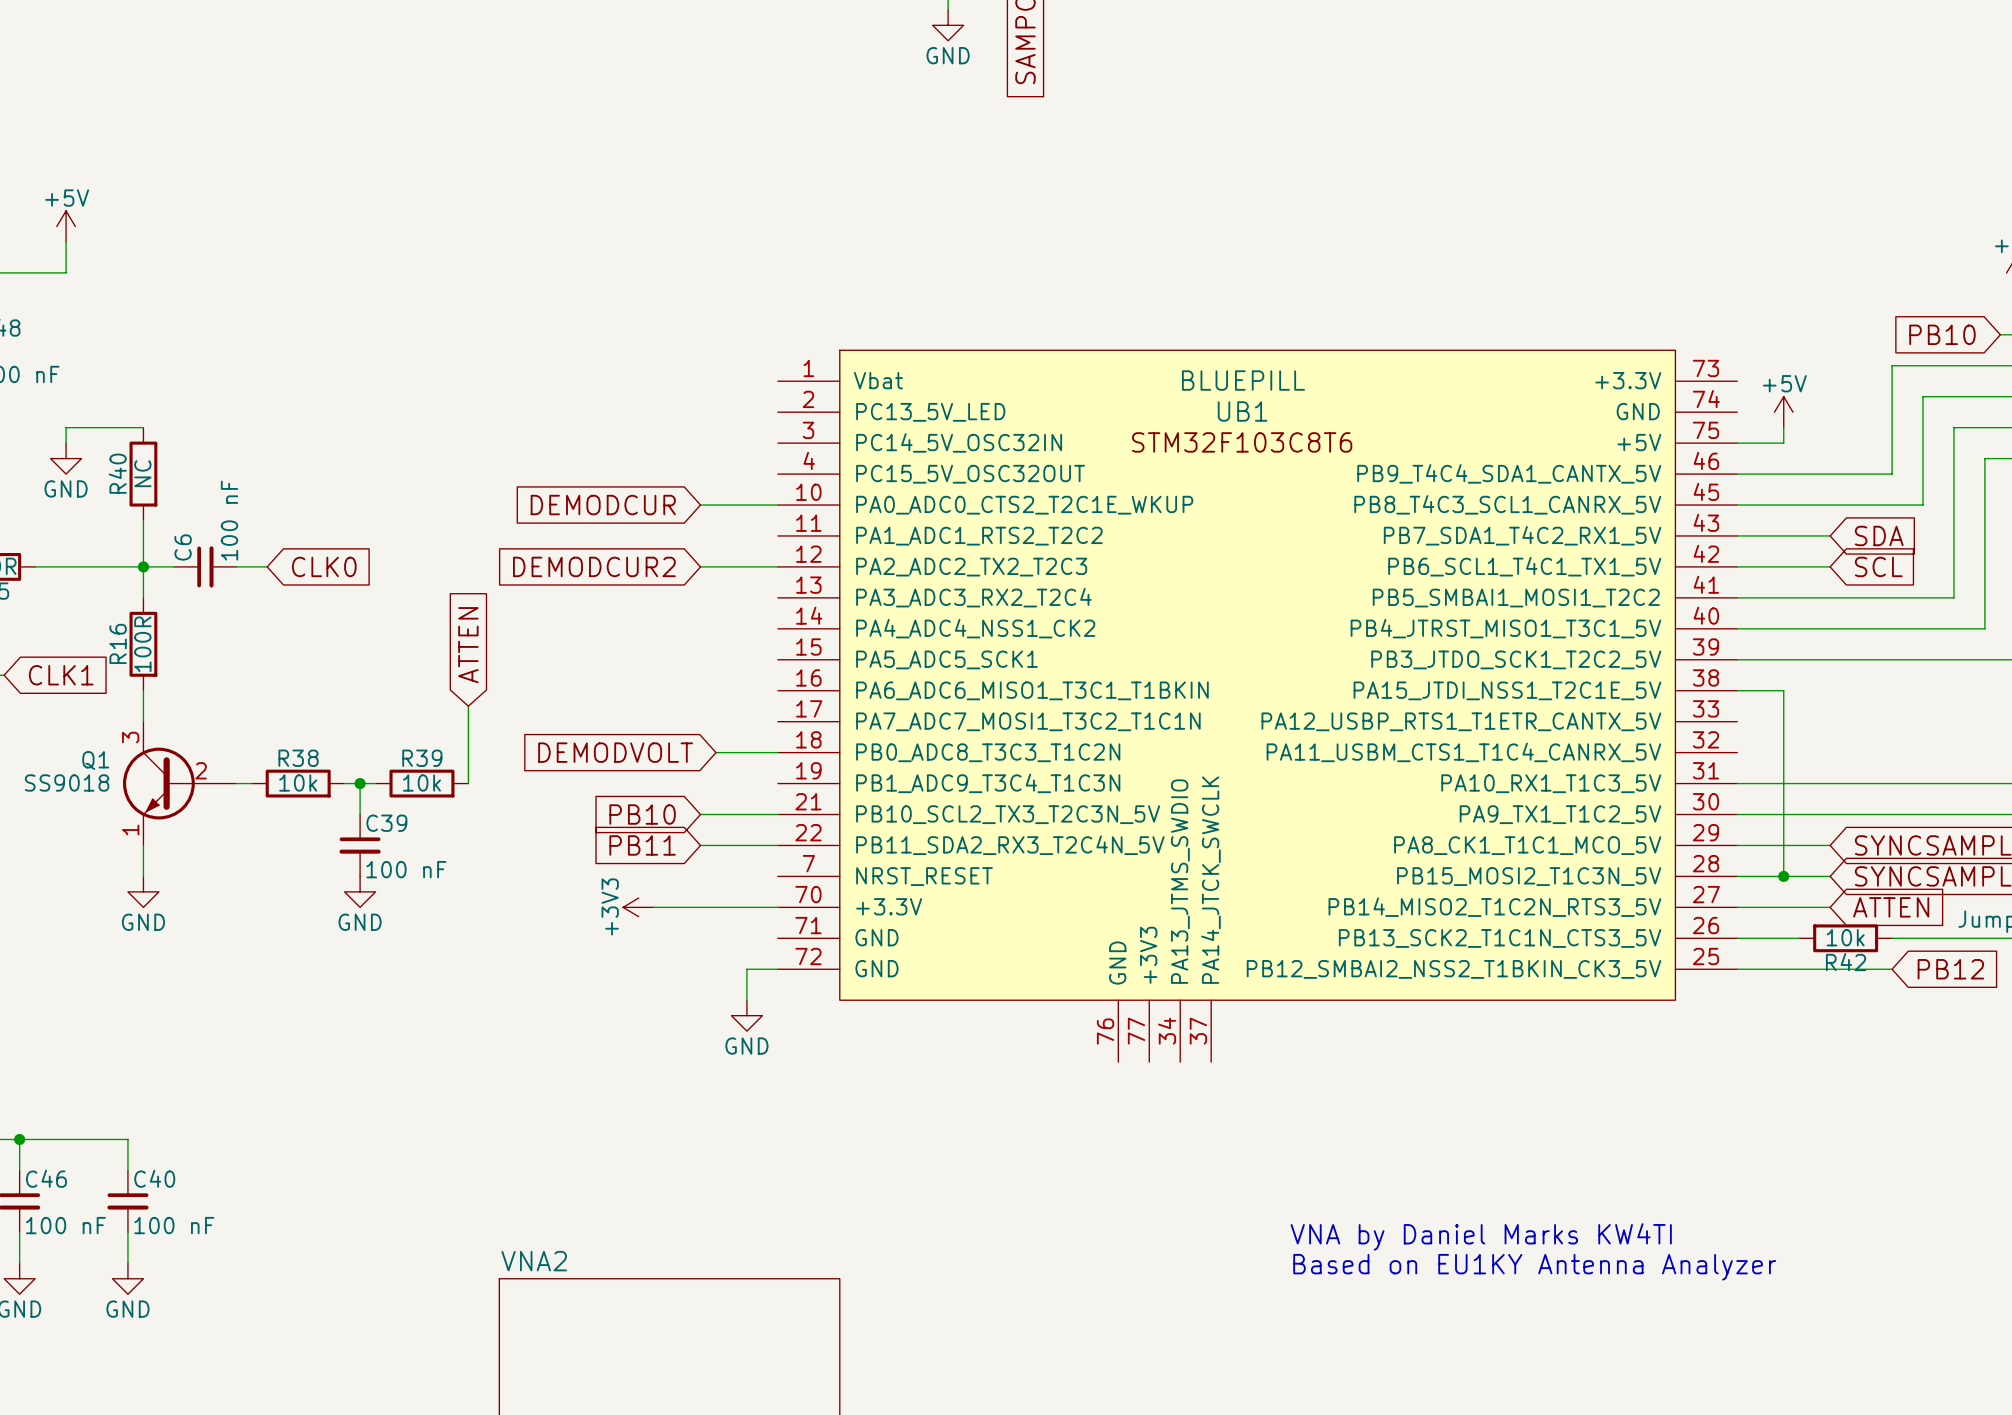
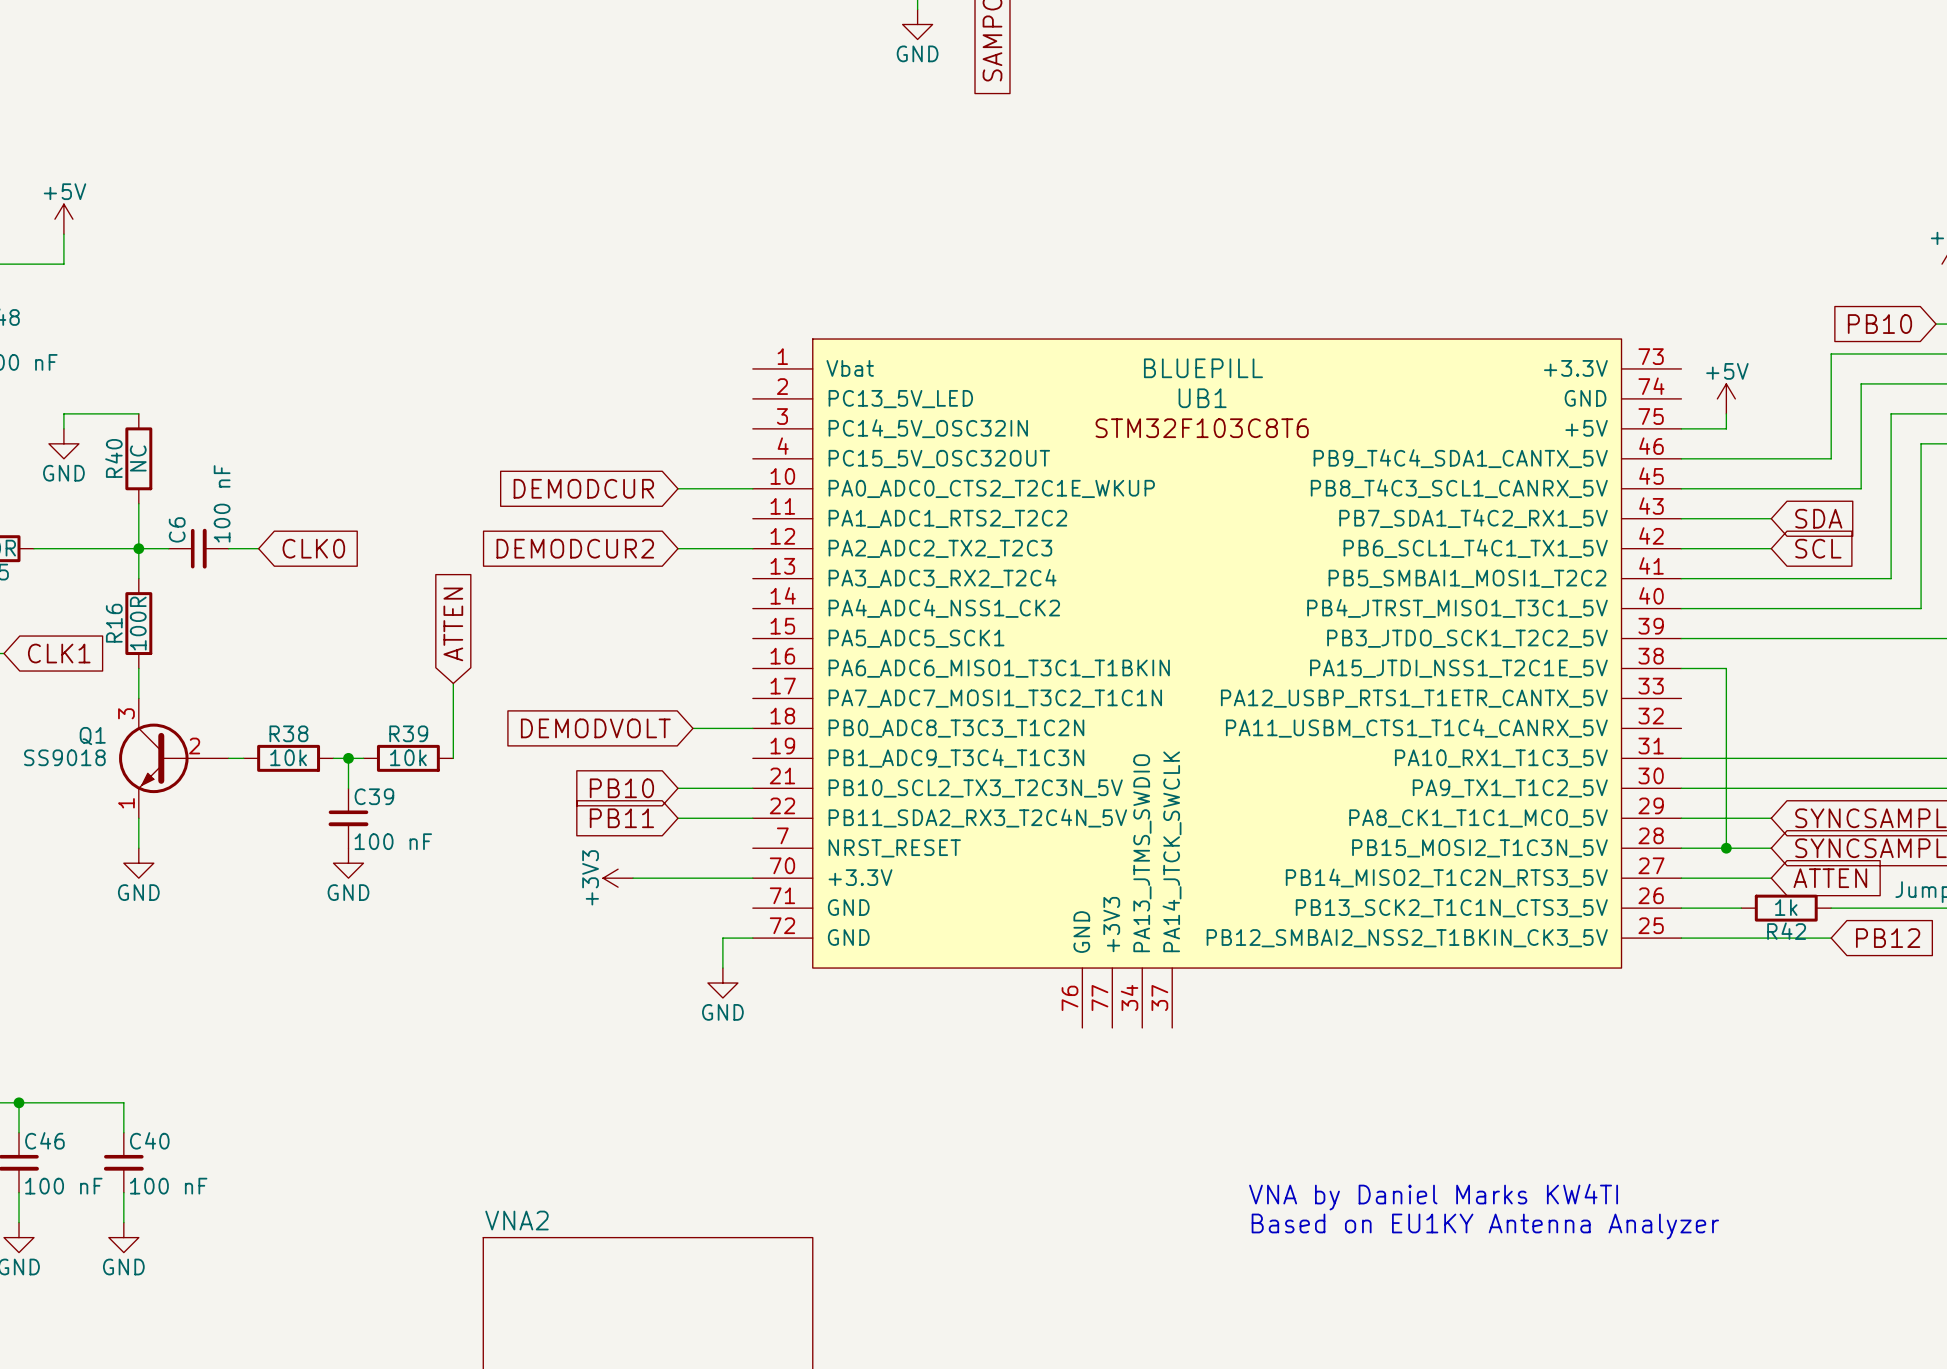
R42 value: 10k (1845, 937) -> 1k (1786, 907)

